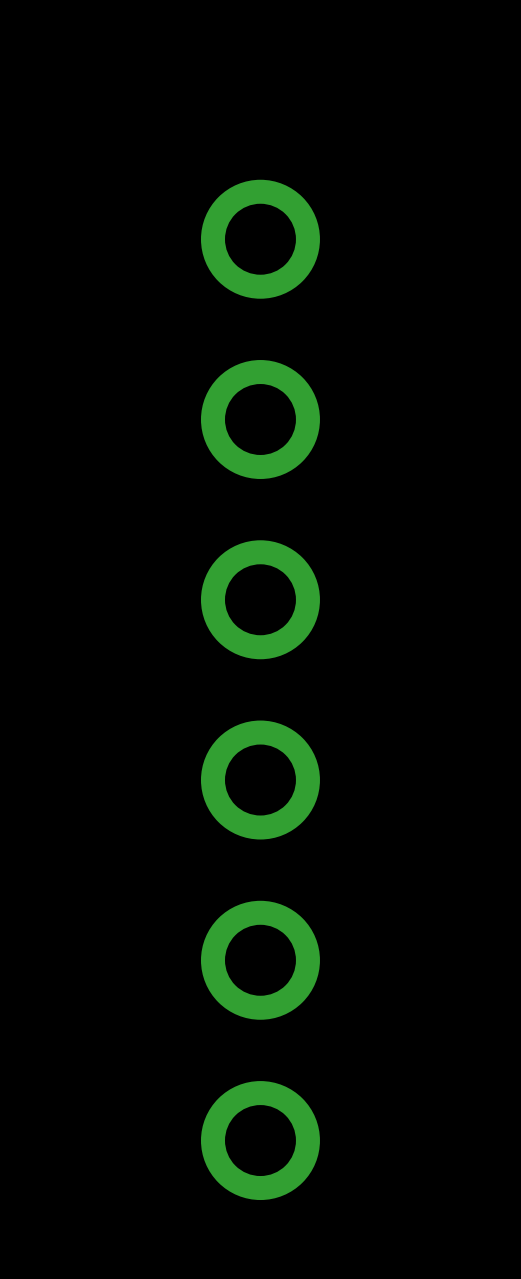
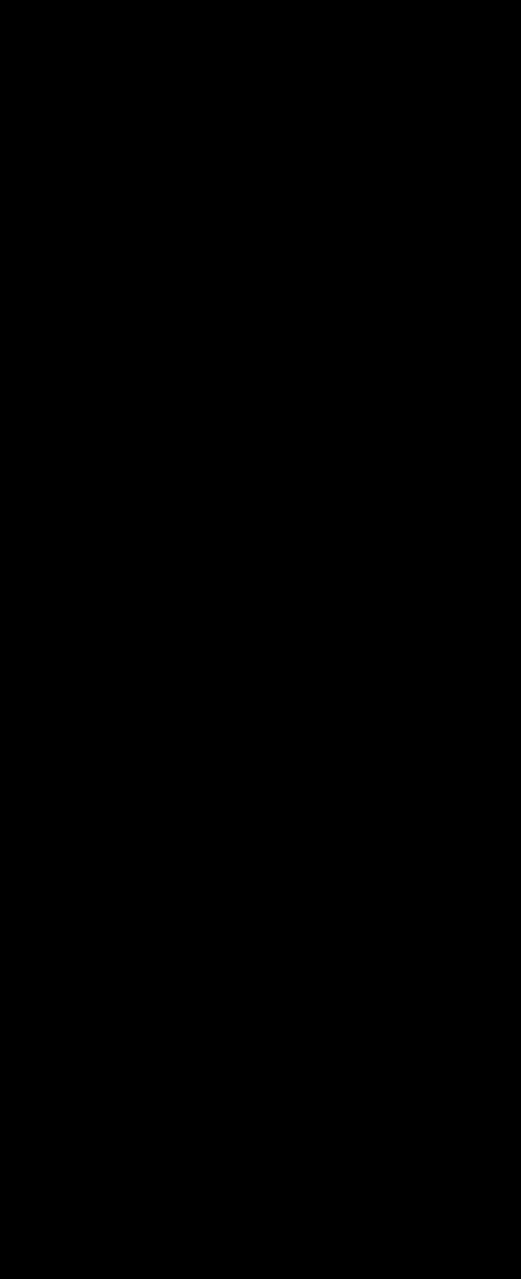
part: (260, 689) -> none

